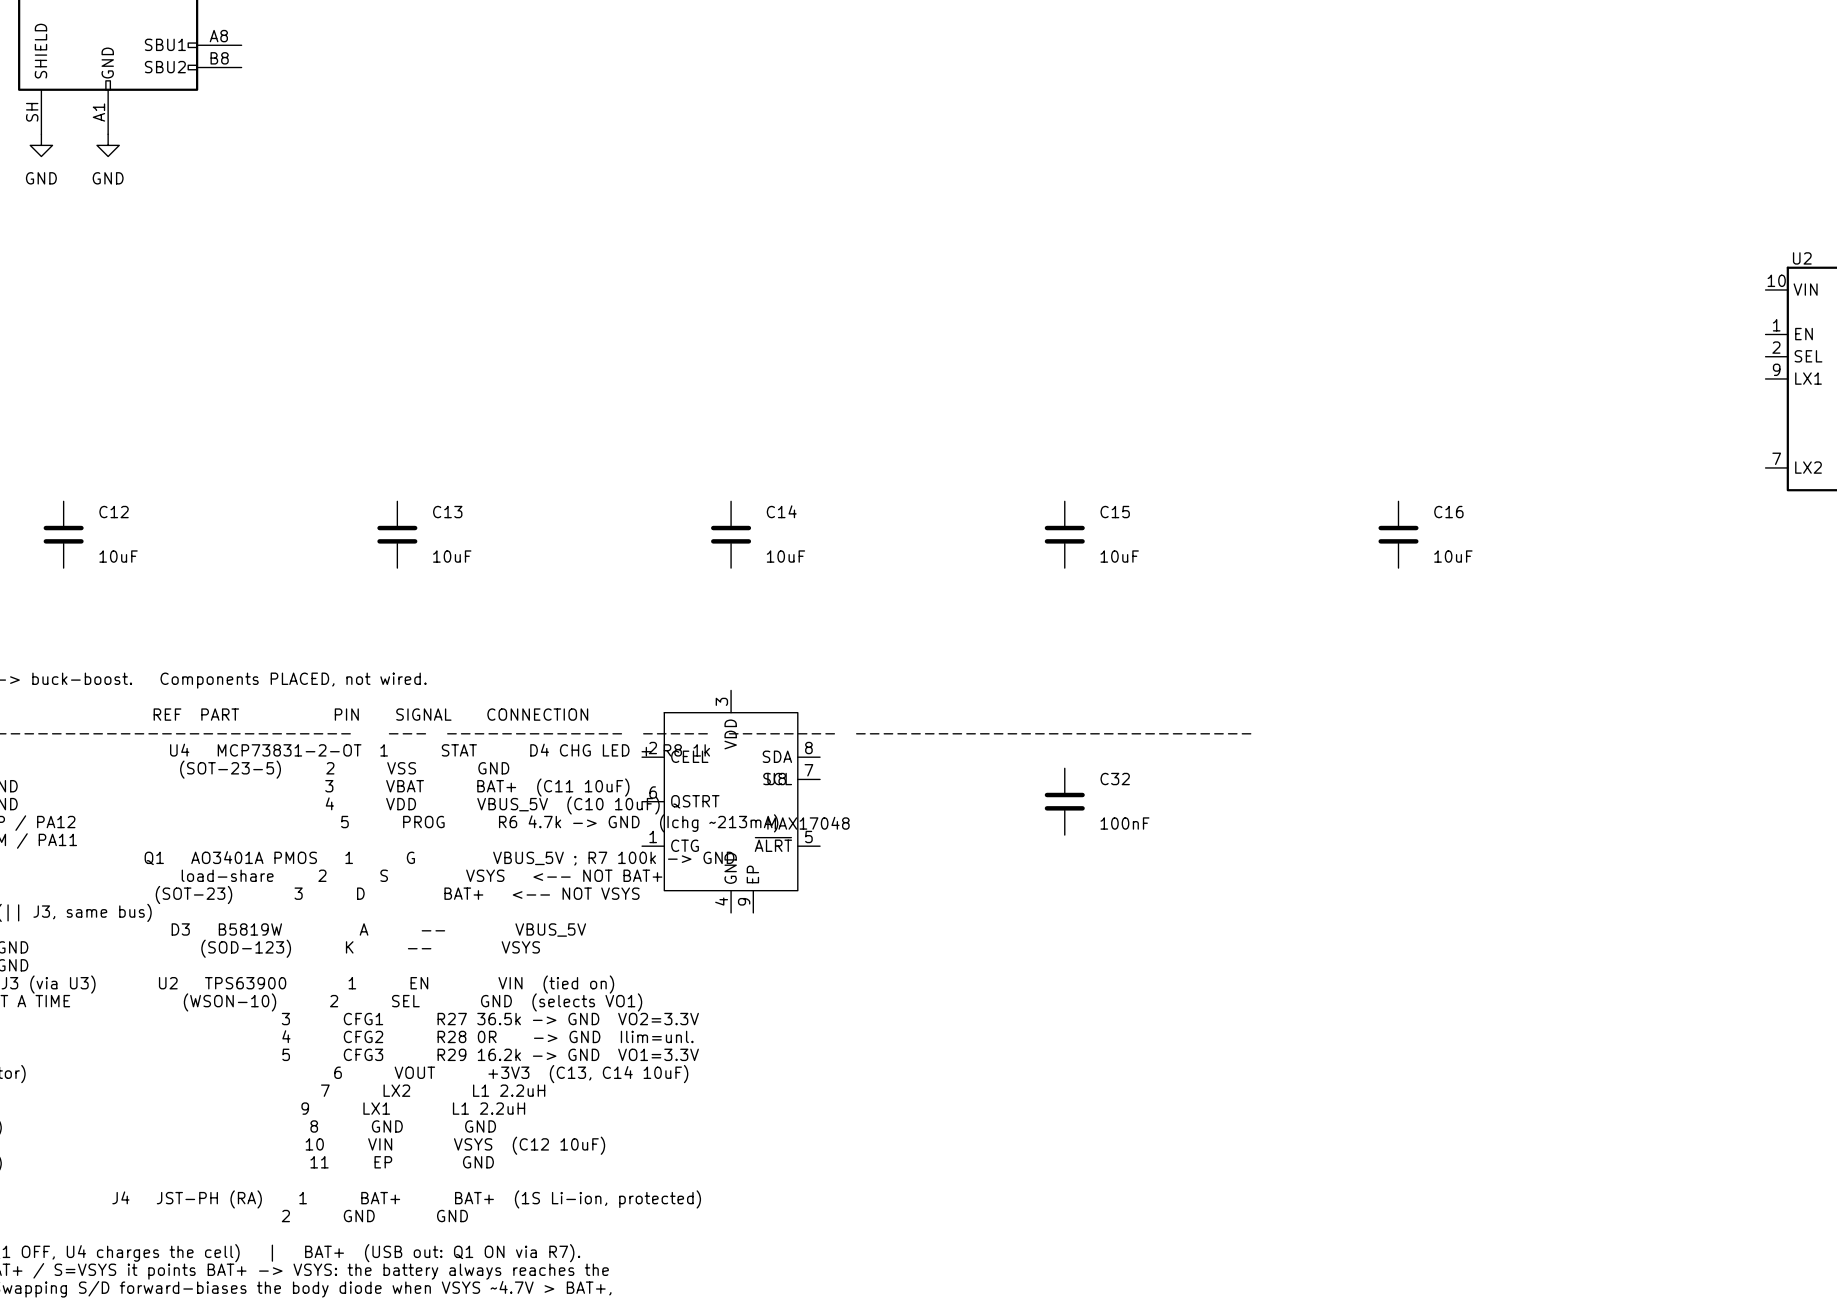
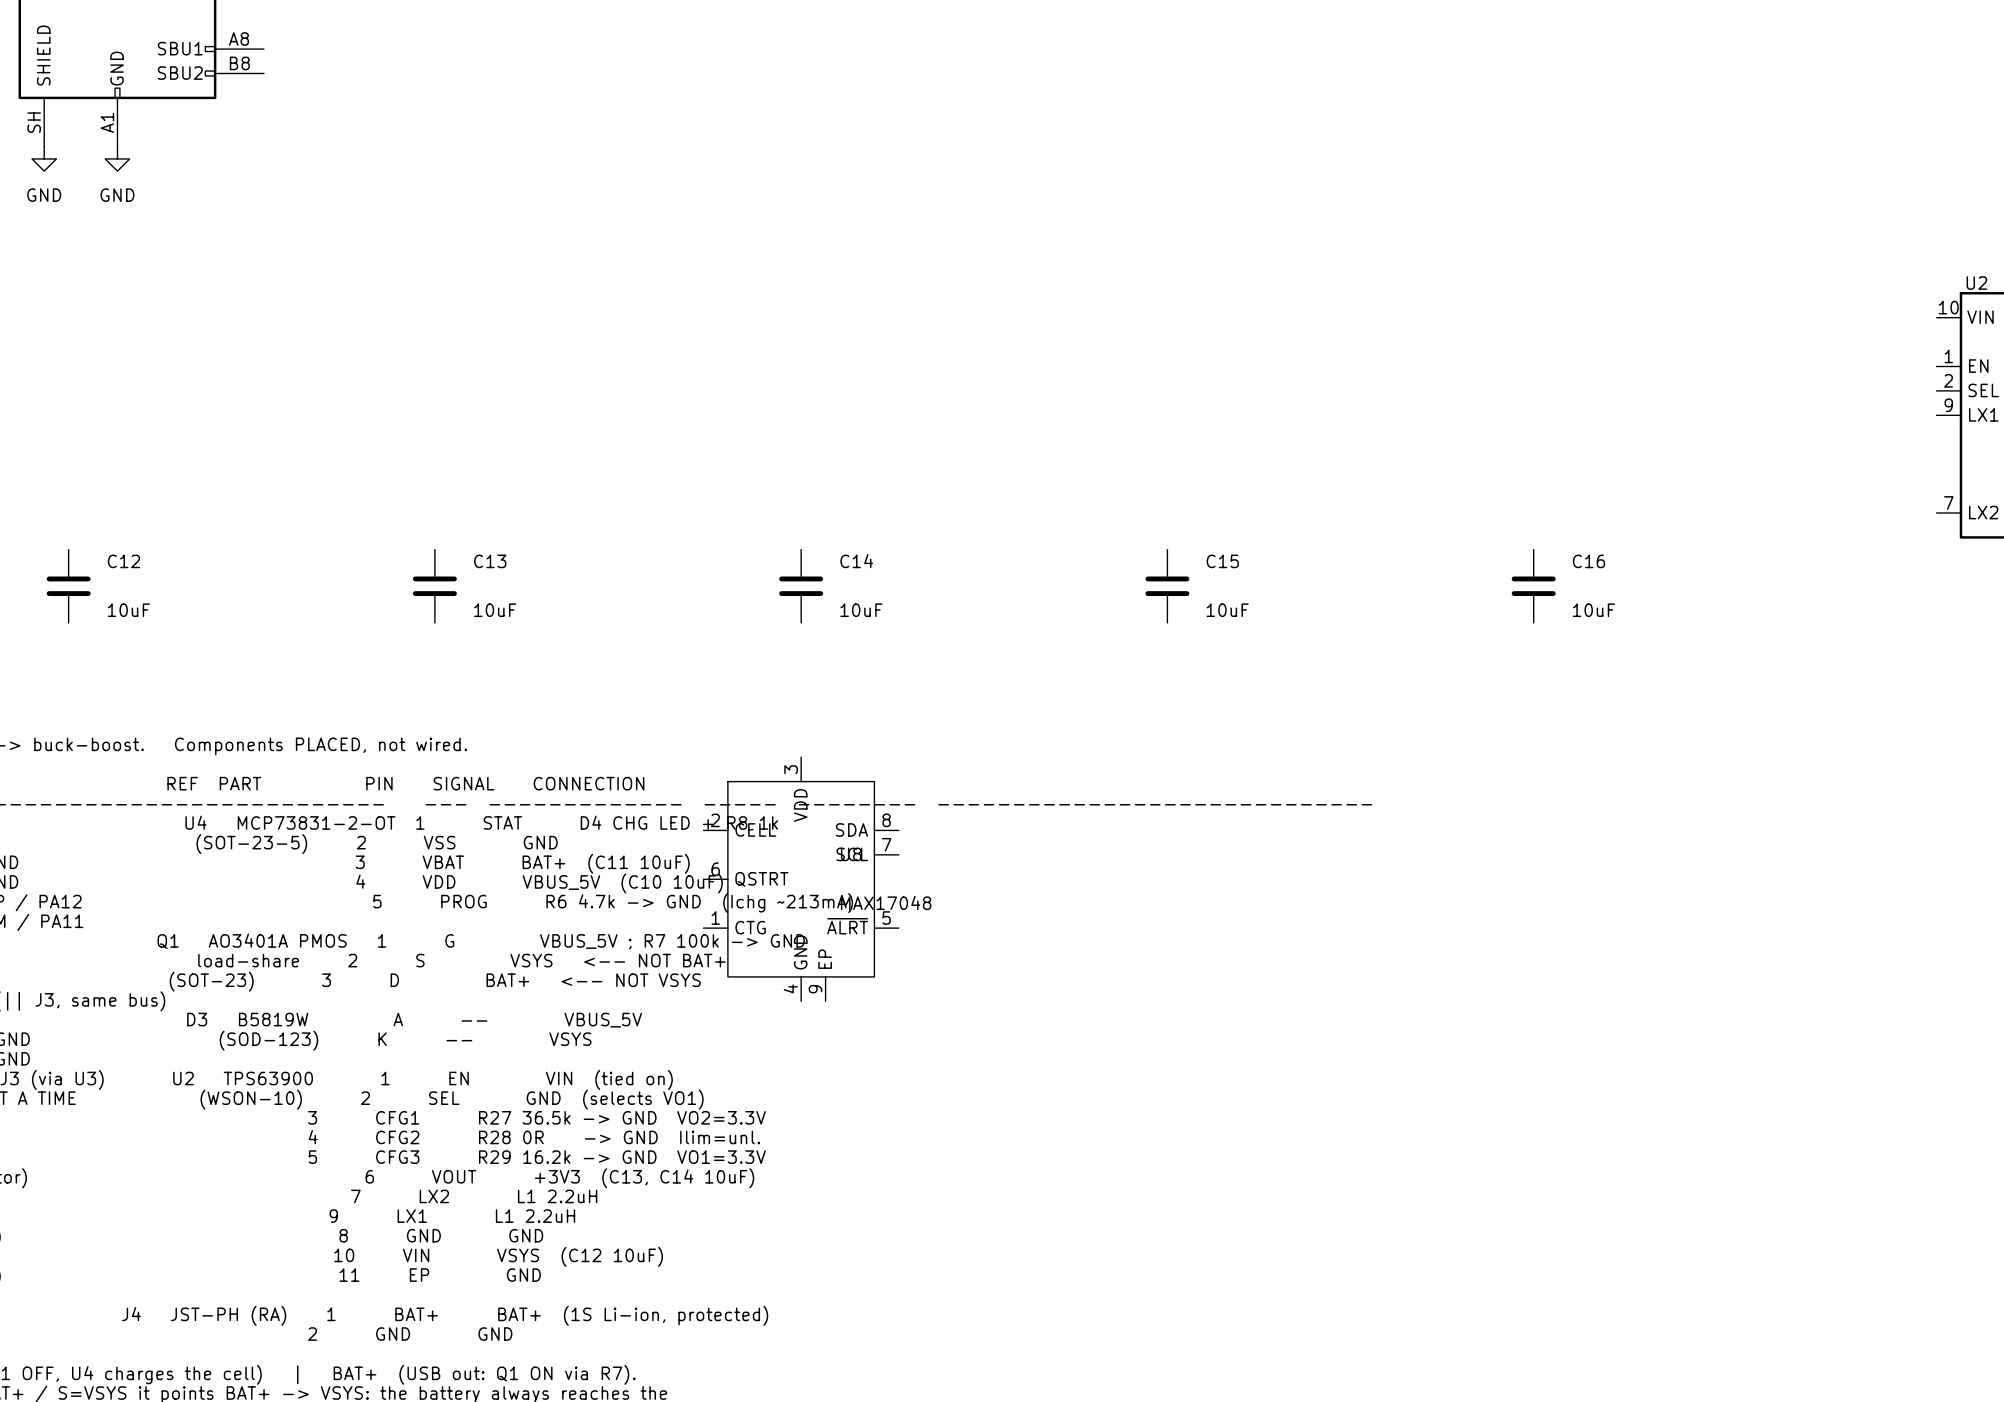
C32: 100nF (1064, 801) -> none

